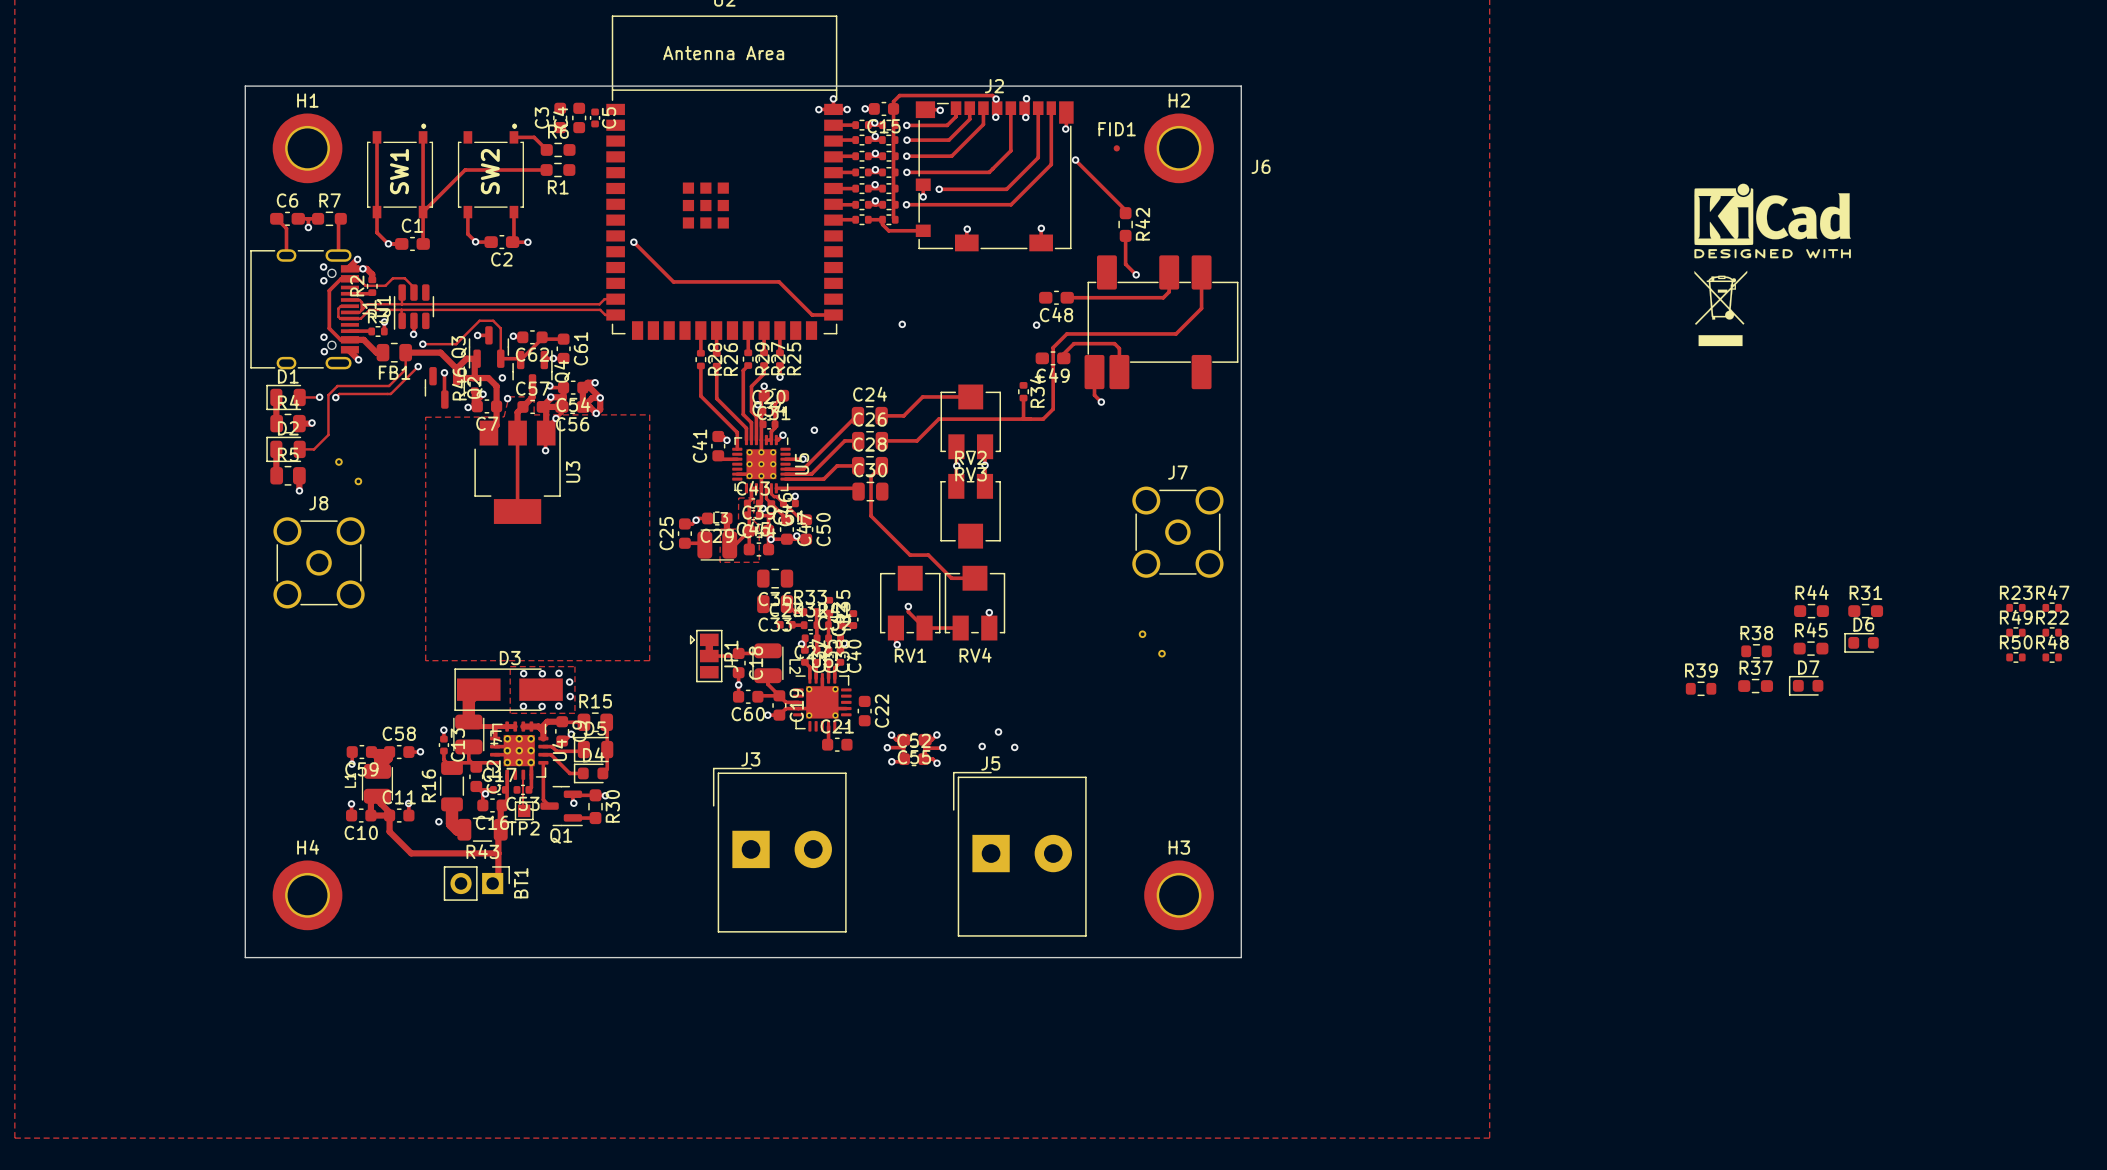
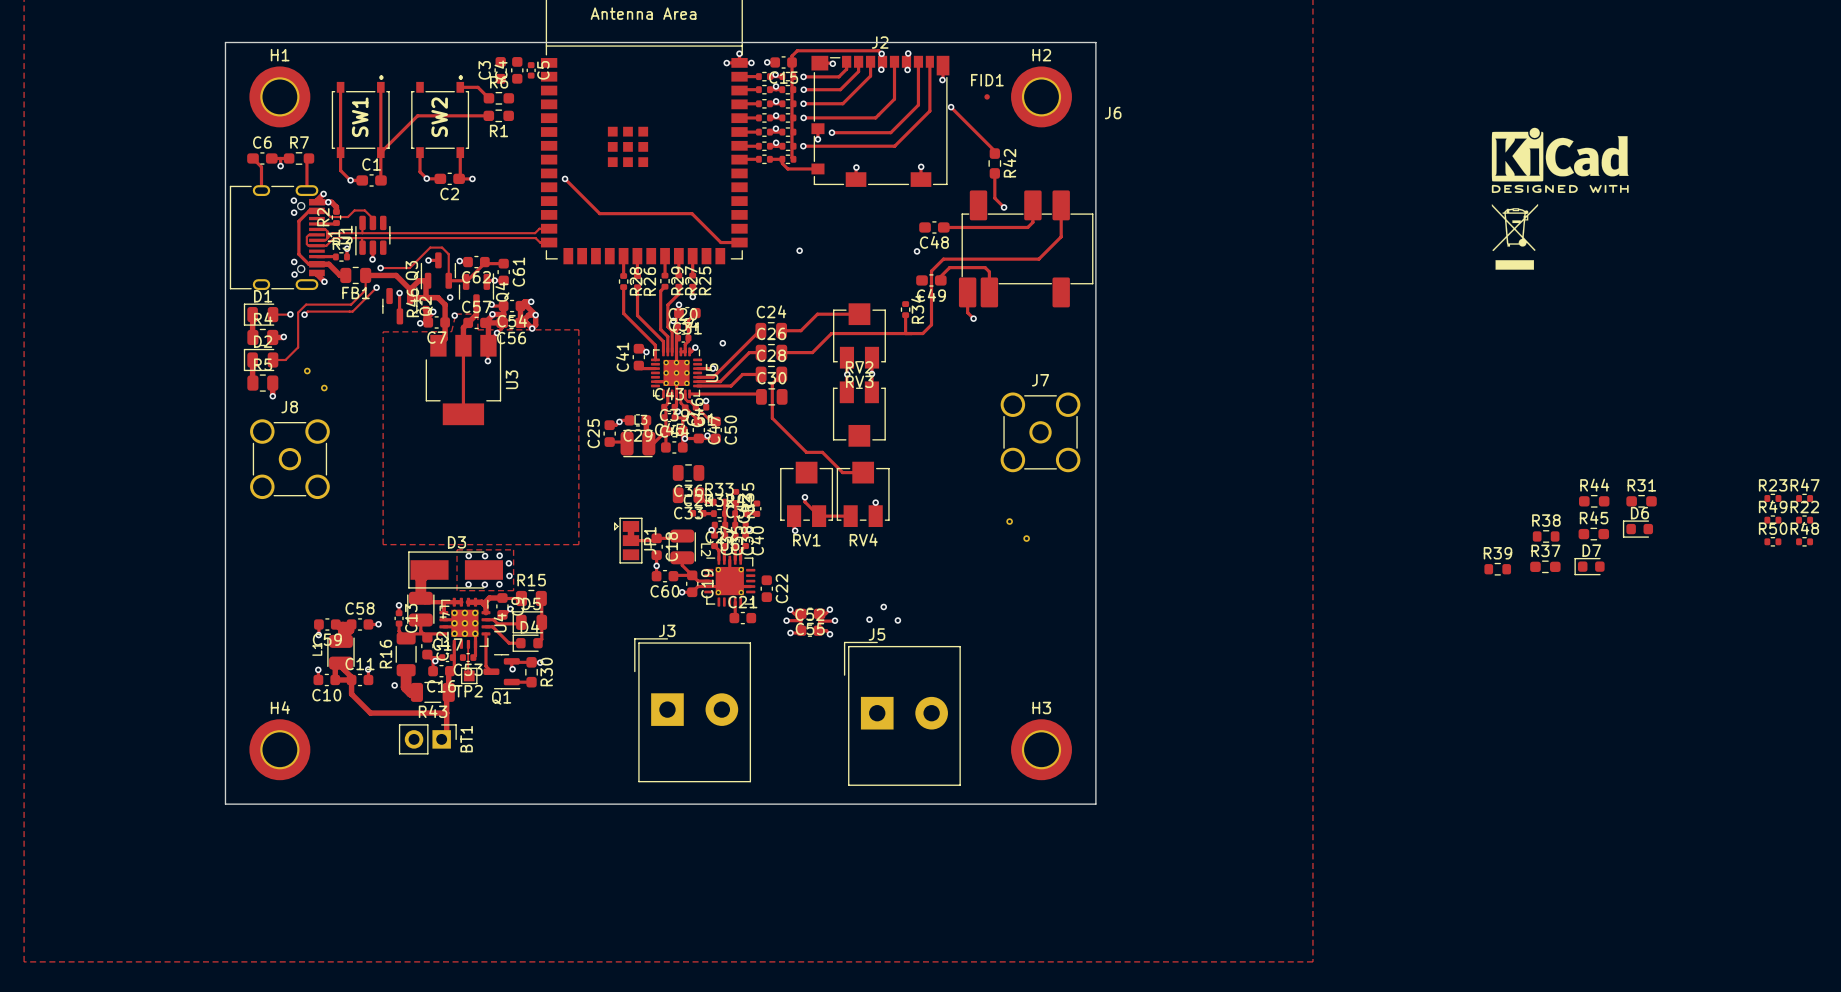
zone outline: (754, 497) (738, 498) (738, 529) (720, 529) (720, 562) (759, 562) (759, 525) (753, 520) (754, 497) -> none

